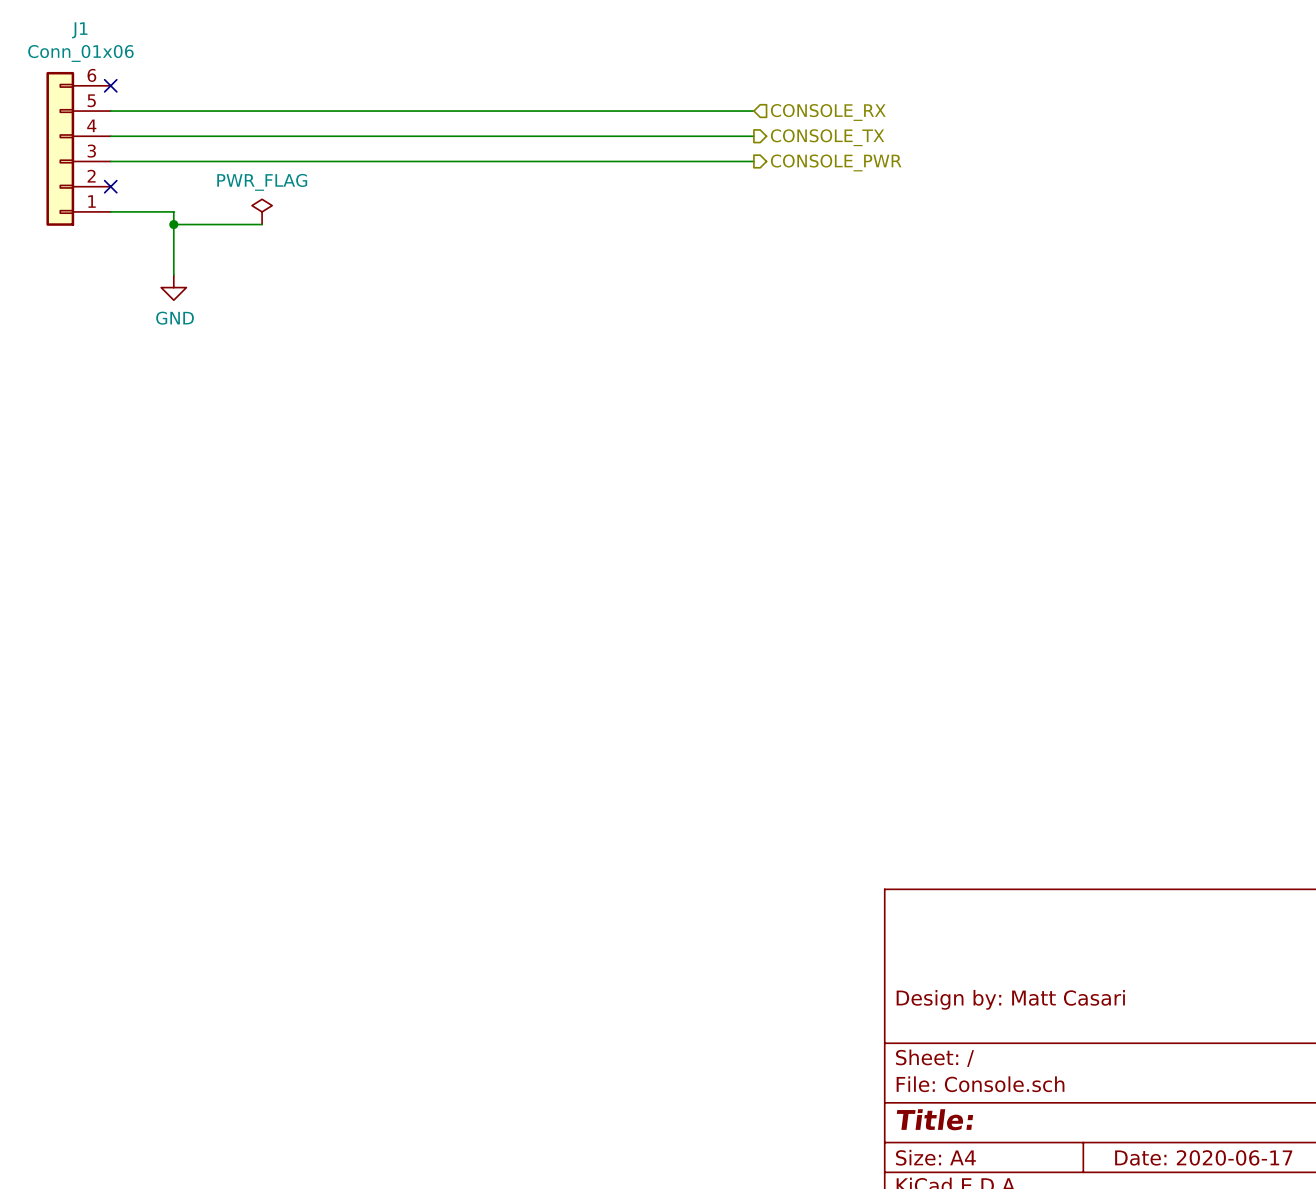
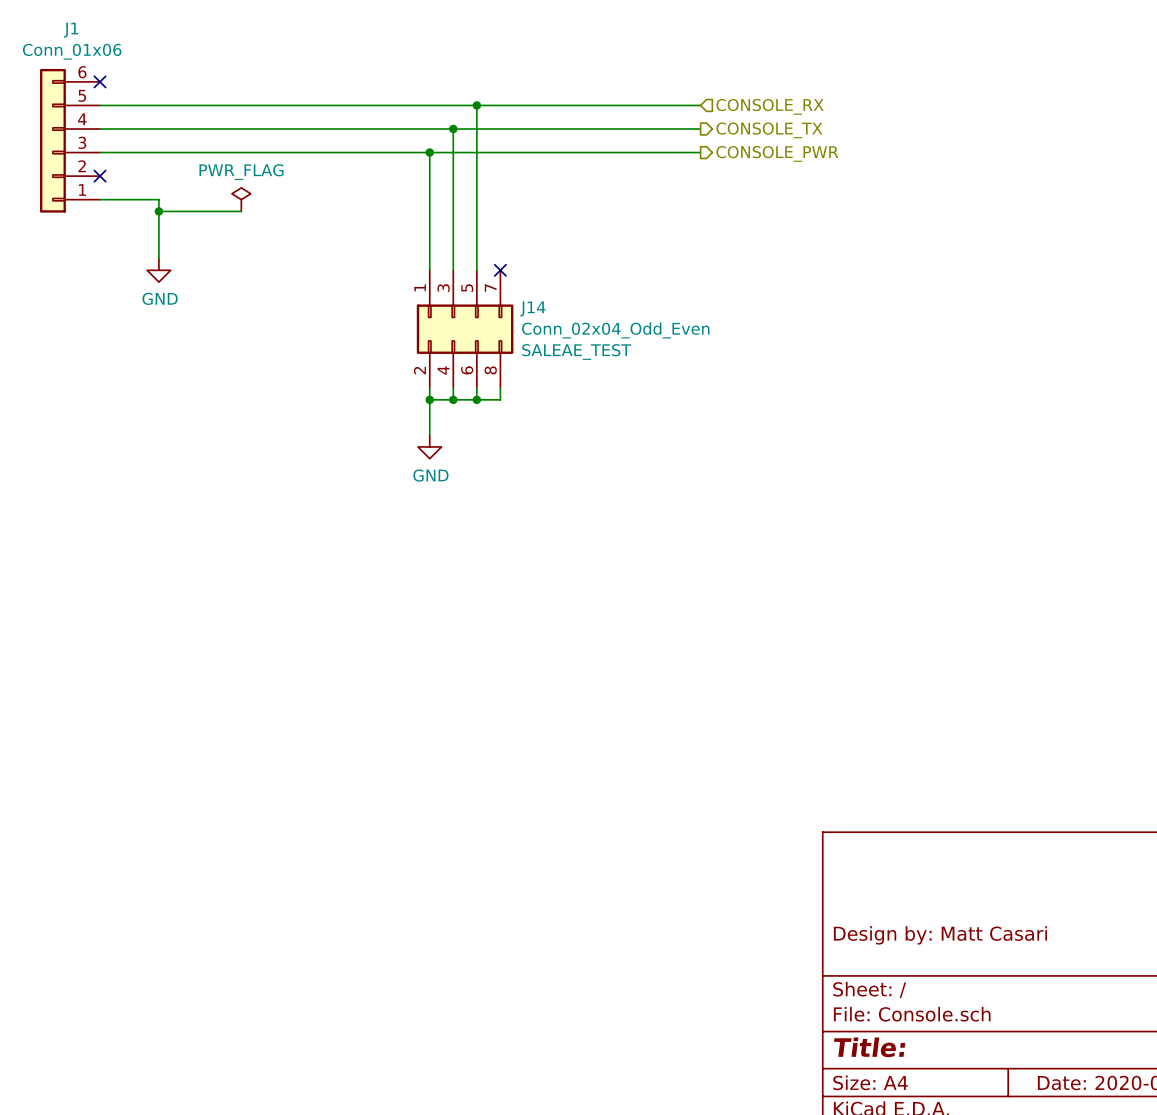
wire: none -> (476, 105) (476, 270)
junction: none -> (476, 105)
wire: none -> (453, 129) (453, 270)
junction: none -> (453, 129)
wire: none -> (429, 152) (429, 270)
junction: none -> (429, 152)
no-connect mark: none -> (500, 270)
J14: none -> Conn_02x04_Odd_Even (465, 329)
wire: none -> (429, 388) (429, 435)
wire: none -> (453, 388) (453, 399)
wire: none -> (476, 388) (476, 399)
wire: none -> (500, 388) (500, 399) (429, 399)
junction: none -> (429, 399)
junction: none -> (453, 399)
junction: none -> (476, 399)
power symbol: none -> GND (429, 446)

